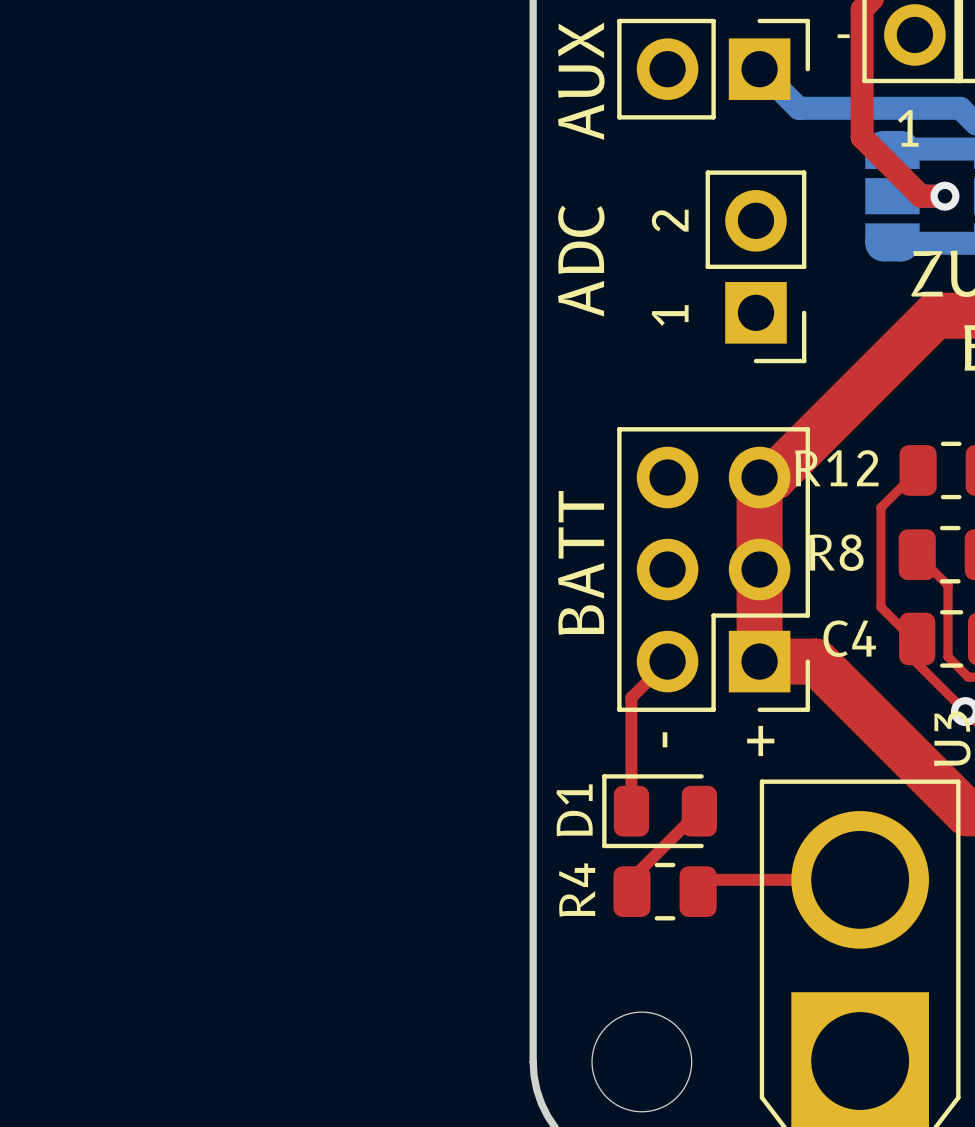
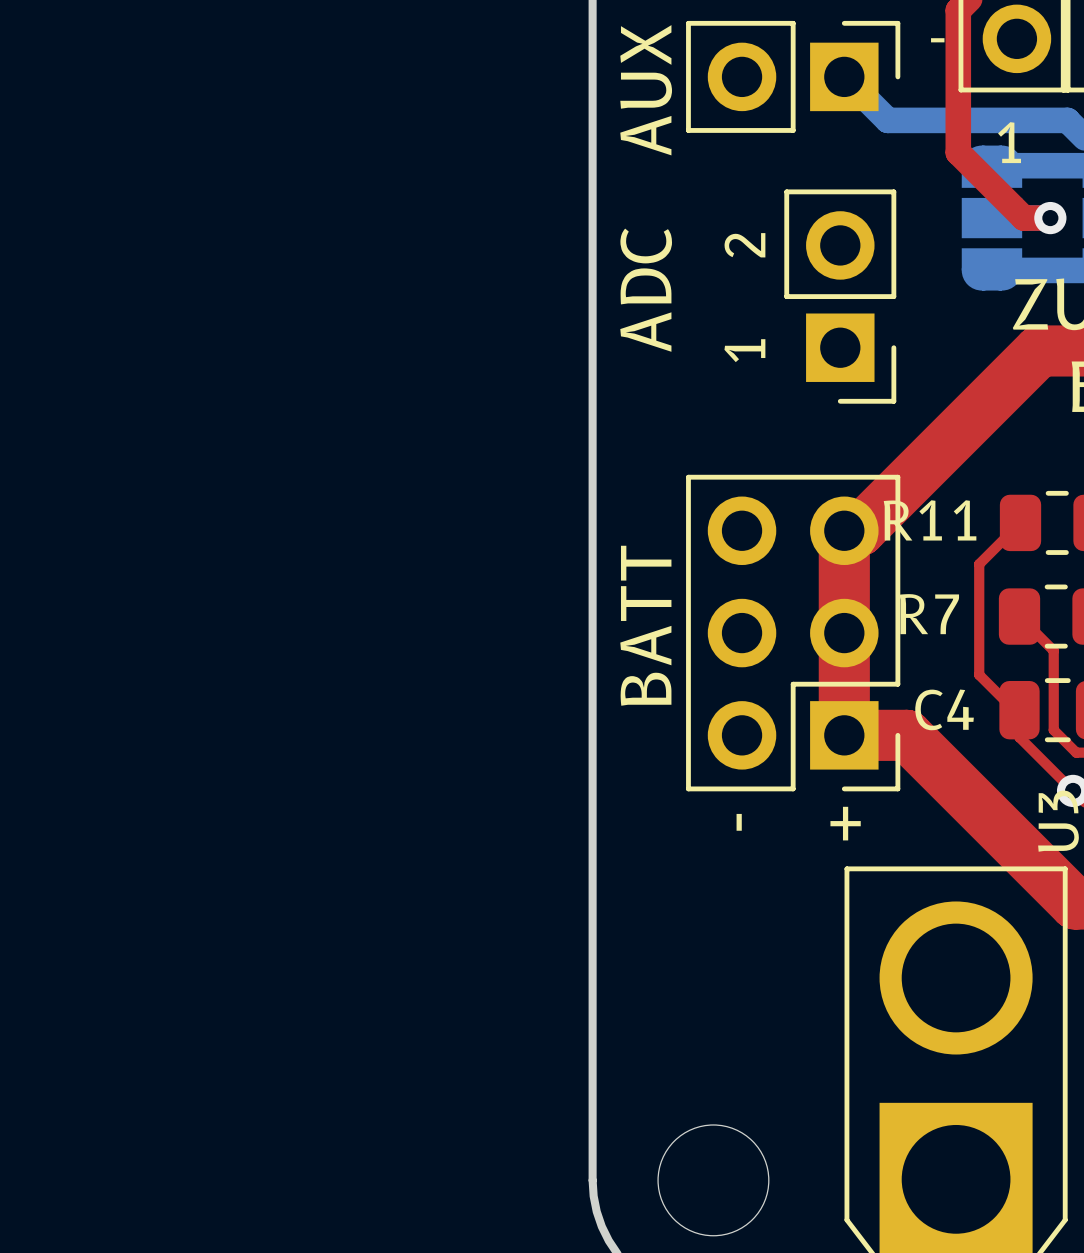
R12 name: R12 (836, 468) -> R11 (930, 520)
R8 name: R8 (836, 552) -> R7 (929, 614)
top track: (667, 661) (631, 697) (631, 811) -> none
D1: (659, 811) -> none
top track: (699, 811) (631, 878) (631, 891) -> none
top track: (860, 879) (709, 879) (698, 891) -> none
R4: (665, 891) -> none

